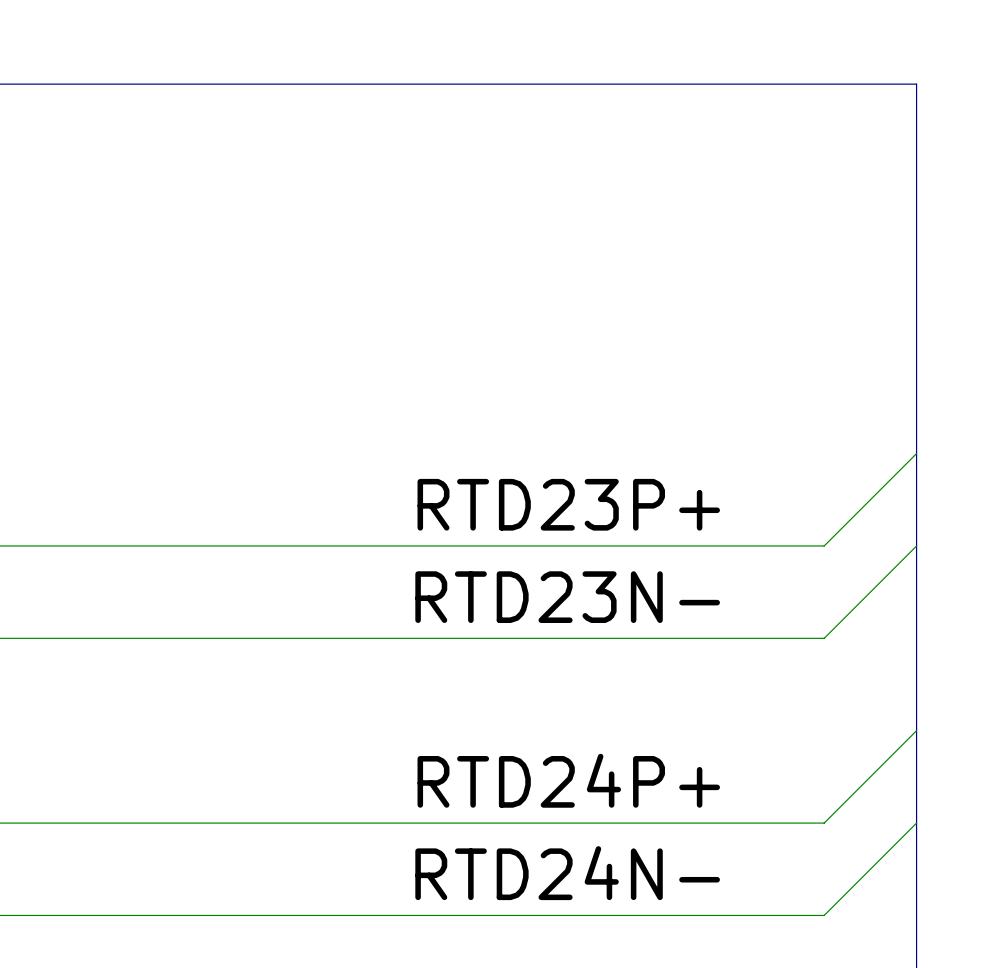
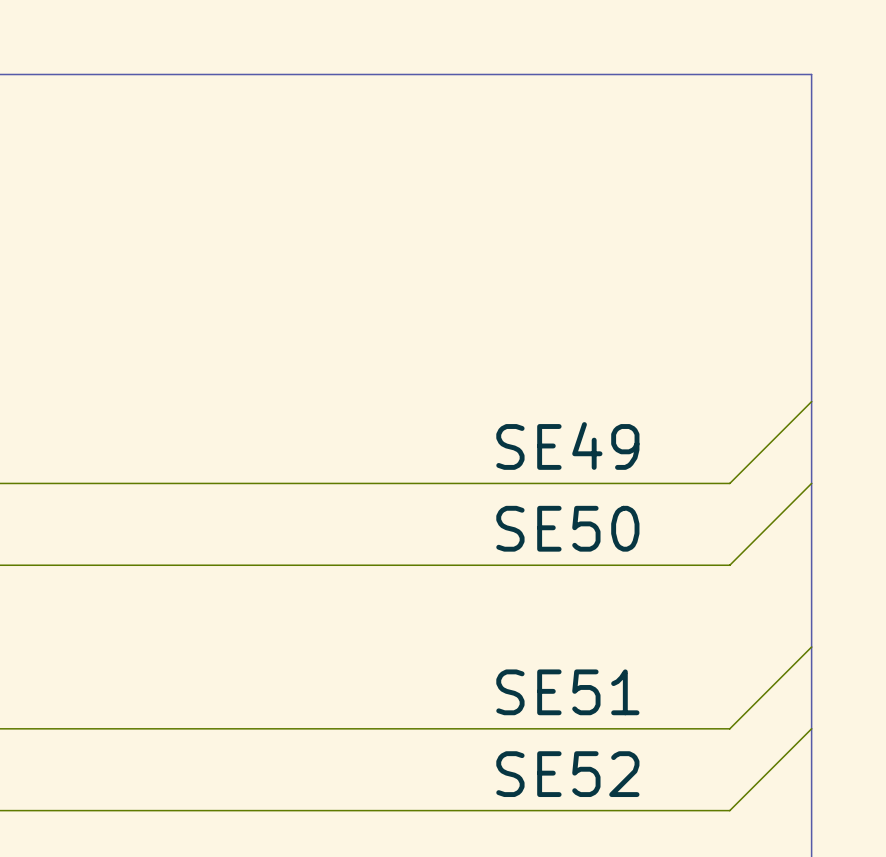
label: RTD23P+ (568, 504) -> SE49 (567, 445)
label: RTD23N- (567, 597) -> SE50 (567, 528)
label: RTD24P+ (568, 780) -> SE51 (567, 692)
label: RTD24N- (567, 873) -> SE52 (567, 774)

